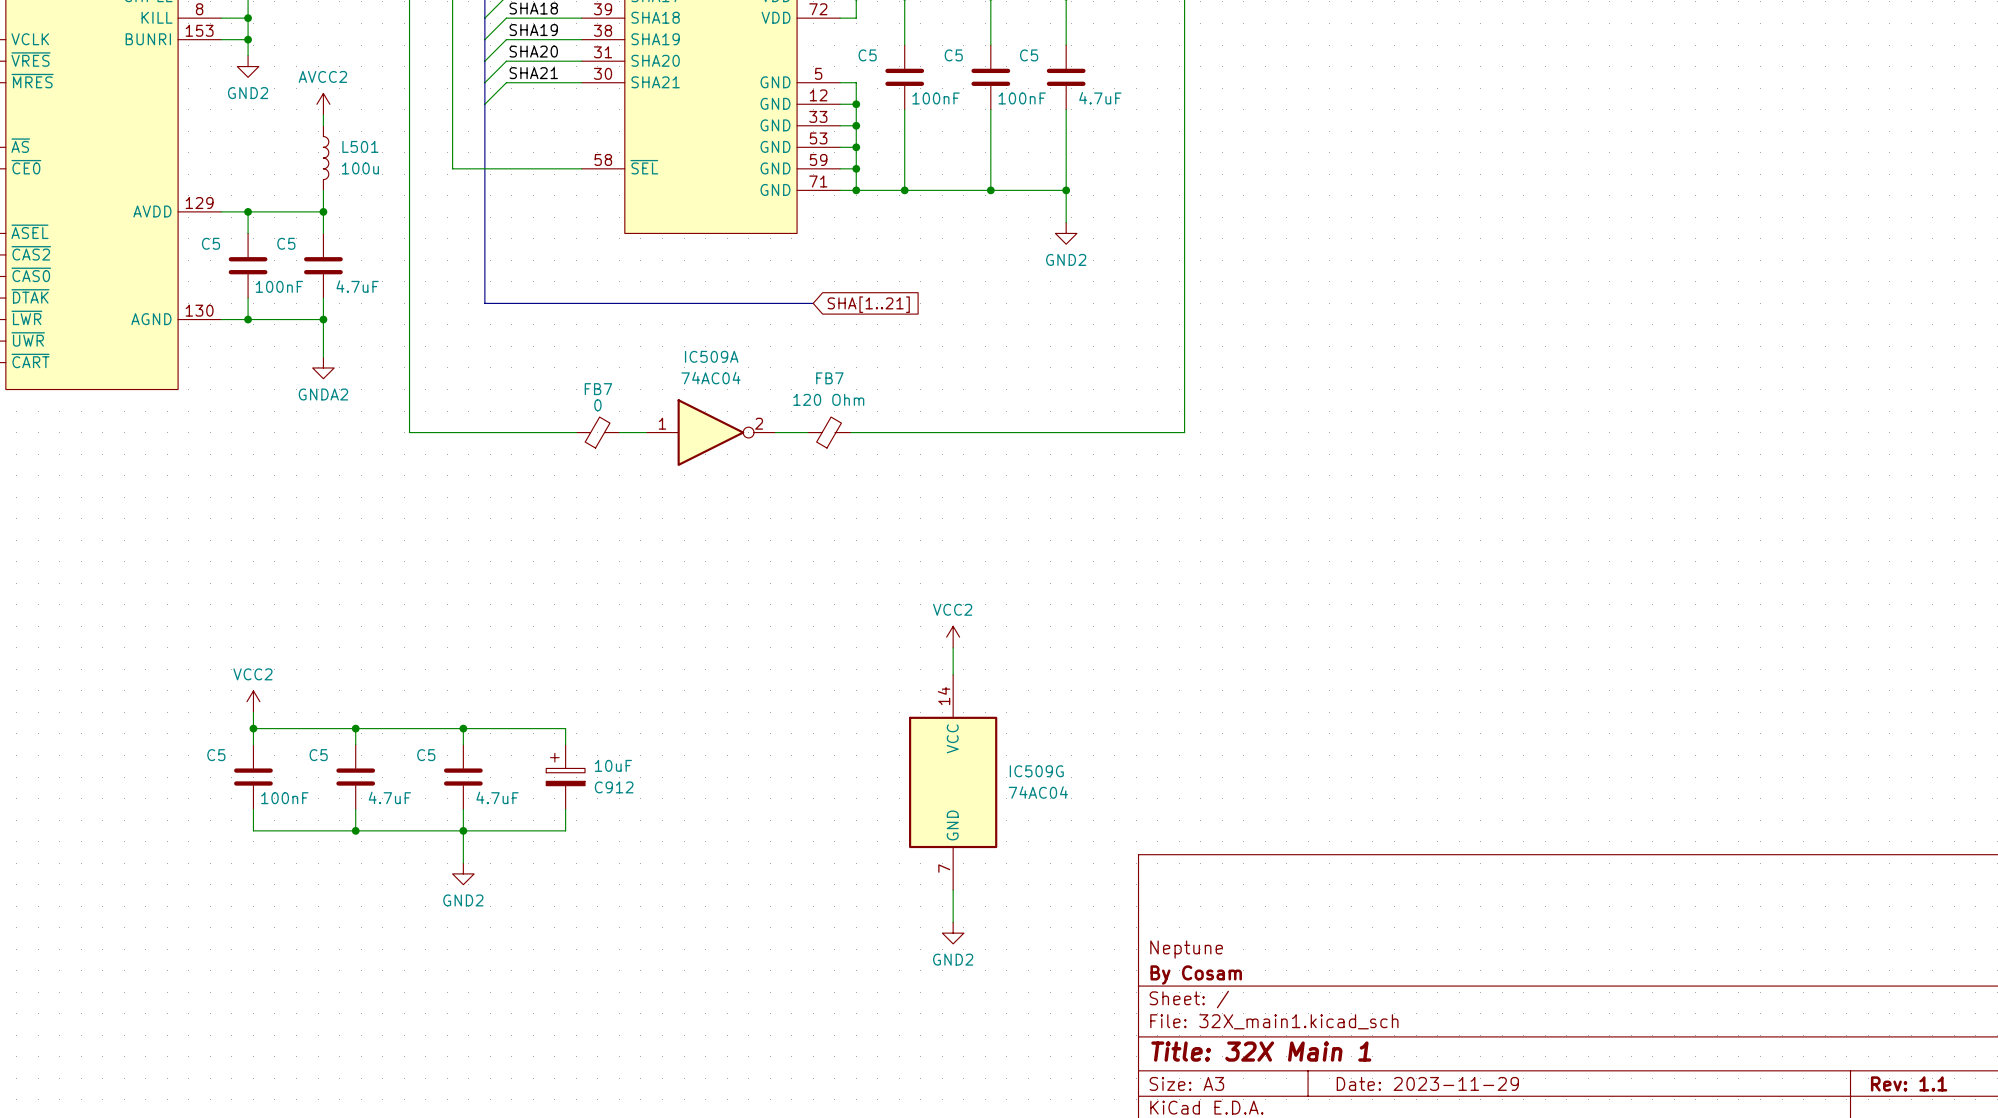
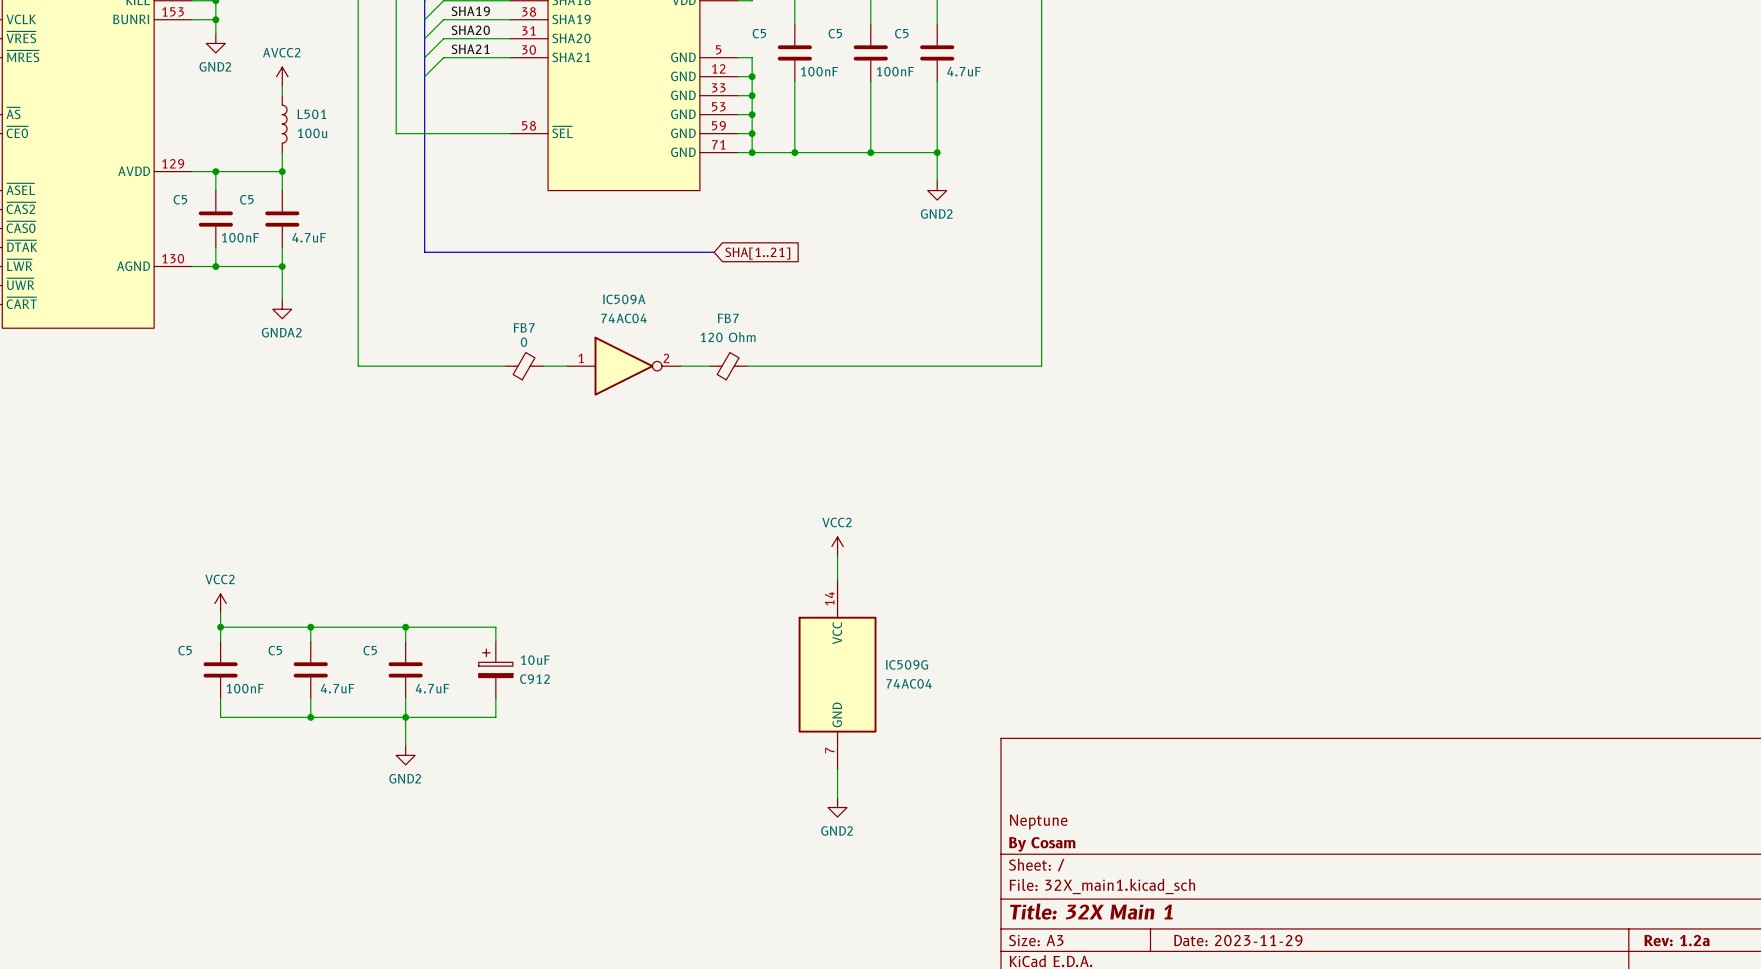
title block: Rev: 1.1 (1909, 1083) -> Rev: 1.2a (1677, 940)

